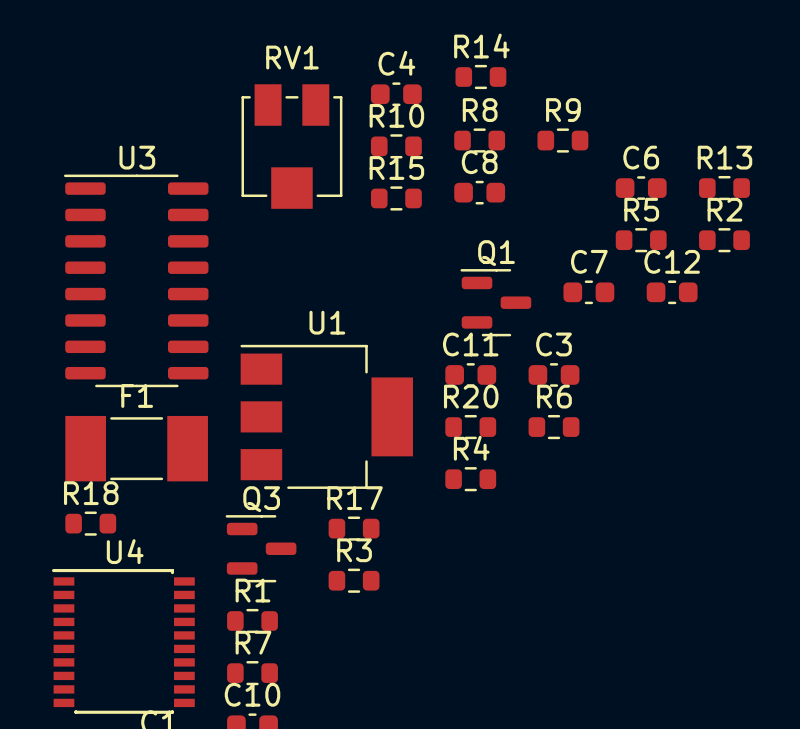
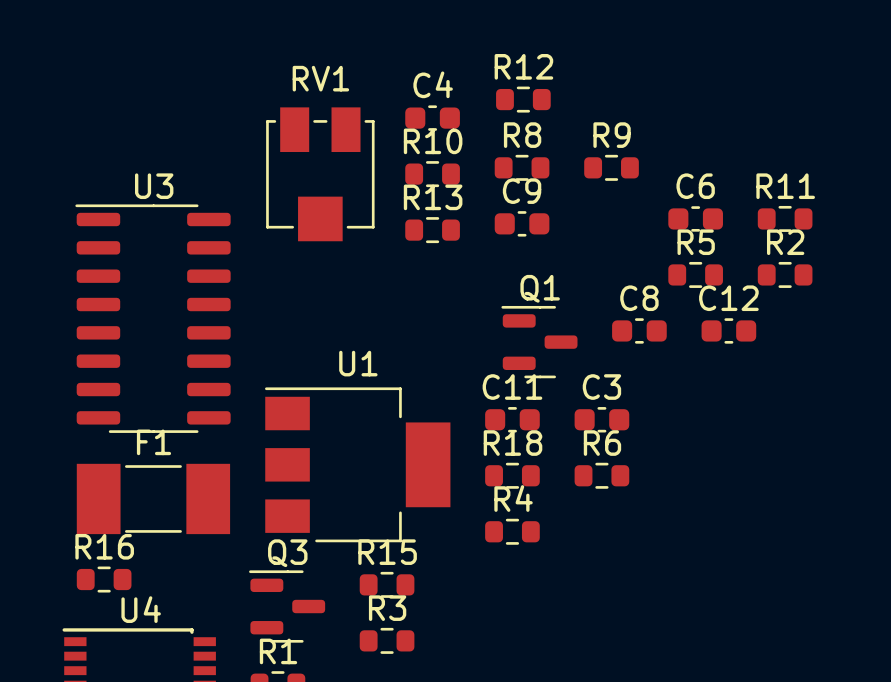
R14 name: R14 (481, 46) -> R12 (523, 66)
R13 name: R13 (724, 157) -> R11 (785, 186)
C8 name: C8 (479, 162) -> C9 (522, 191)
R15 name: R15 (396, 167) -> R13 (433, 197)
C7 name: C7 (589, 261) -> C8 (639, 298)
R20 name: R20 (471, 396) -> R18 (512, 443)
R18 name: R18 (91, 493) -> R16 (104, 546)
R17 name: R17 (355, 498) -> R15 (387, 552)

